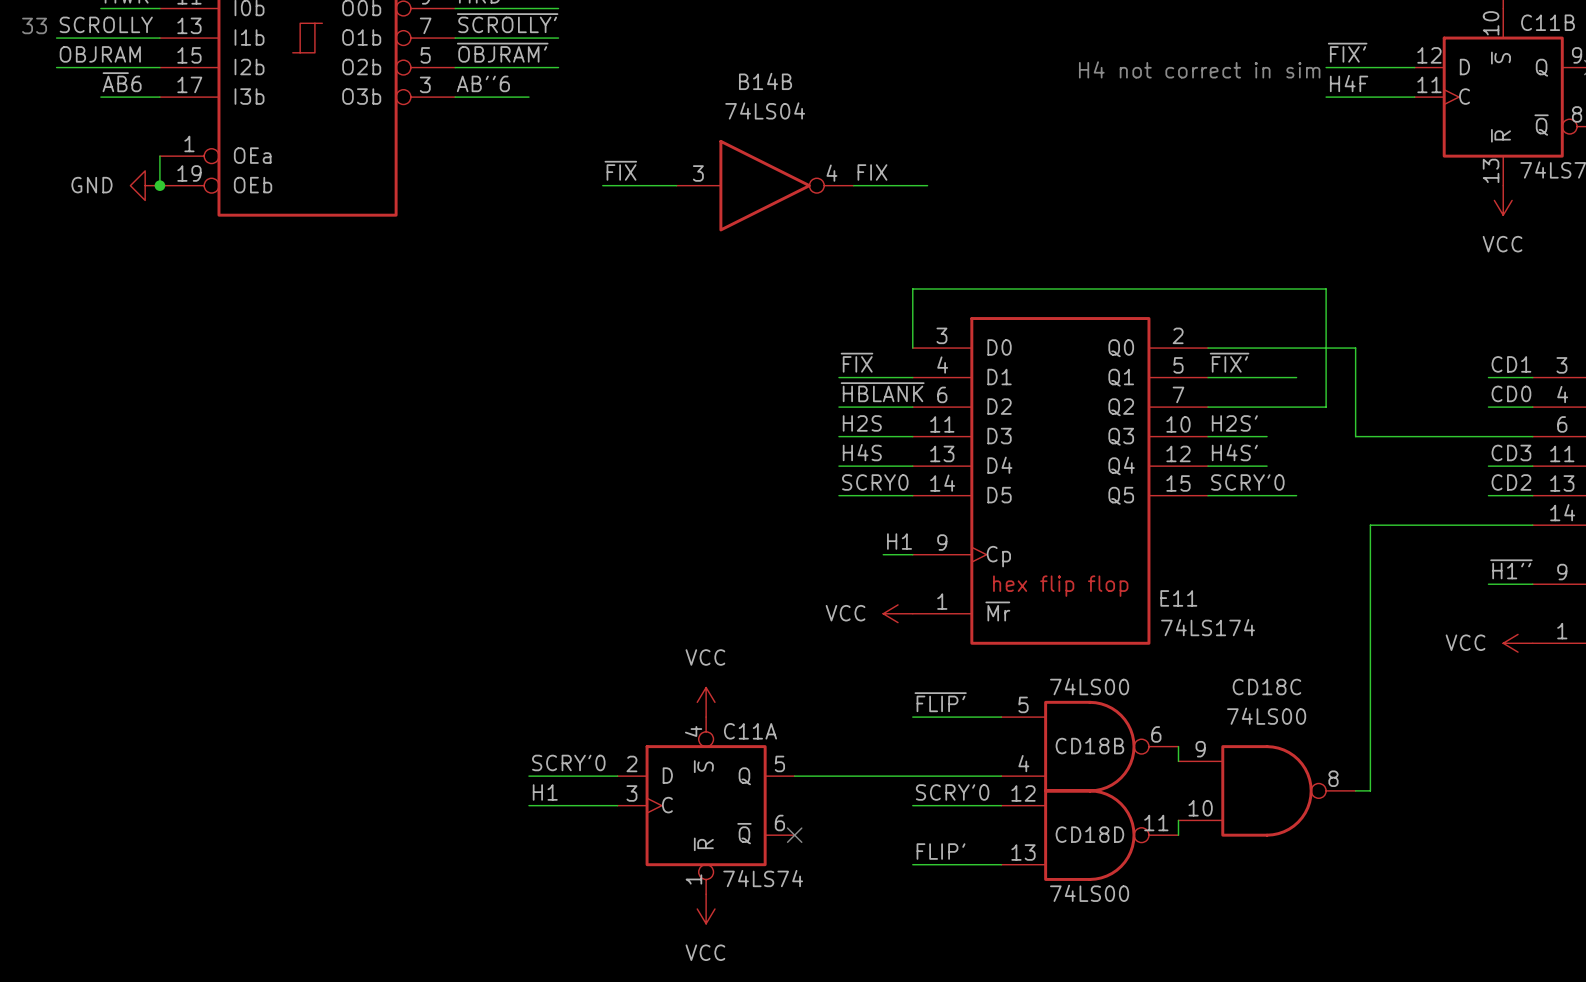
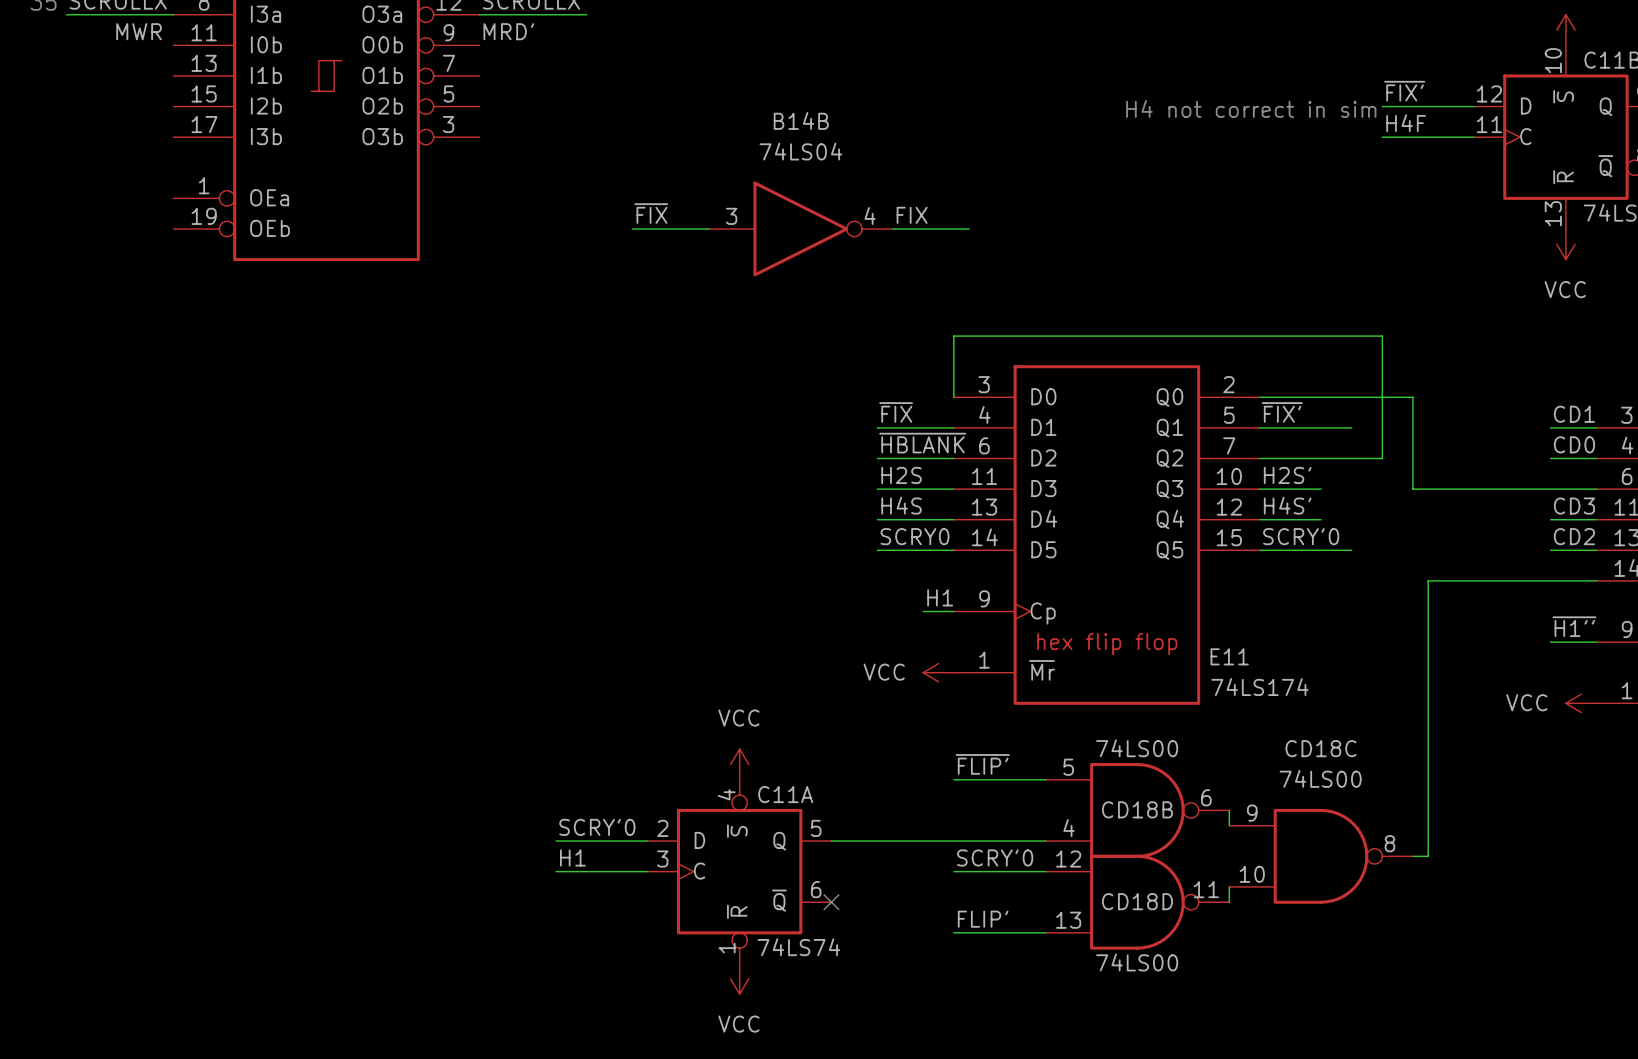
wire: (100, 8) (159, 8) -> none
wire: (455, 8) (558, 8) -> none
label: ~{SCROLLY'} (507, 23) -> none
label: SCROLLY (106, 24) -> none
text: 33 (34, 25) -> none
wire: (56, 38) (159, 38) -> none
wire: (455, 38) (558, 38) -> none
label: ~{OBJRAM'} (502, 52) -> none
label: OBJRAM (100, 54) -> none
wire: (56, 67) (159, 67) -> none
wire: (455, 67) (558, 67) -> none
label: ~{AB}6 (122, 82) -> none
label: AB''6 (483, 83) -> none
wire: (100, 97) (159, 97) -> none
wire: (455, 97) (528, 97) -> none
wire: (159, 156) (159, 185) -> none
power symbol: GND (145, 185) -> none
junction: (159, 185) -> none

